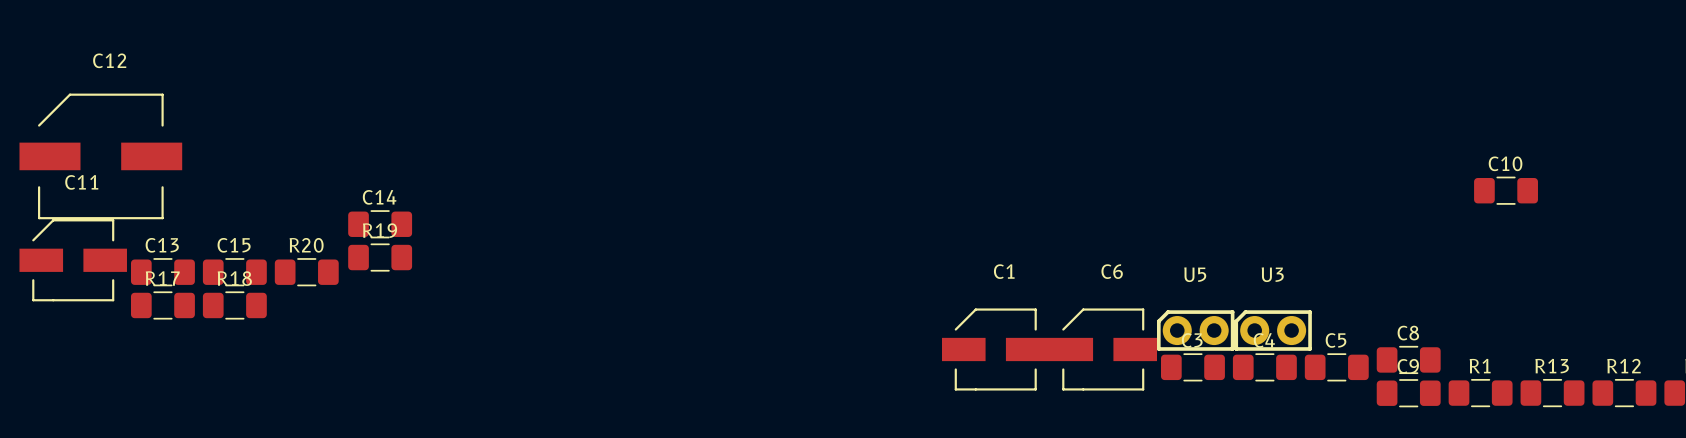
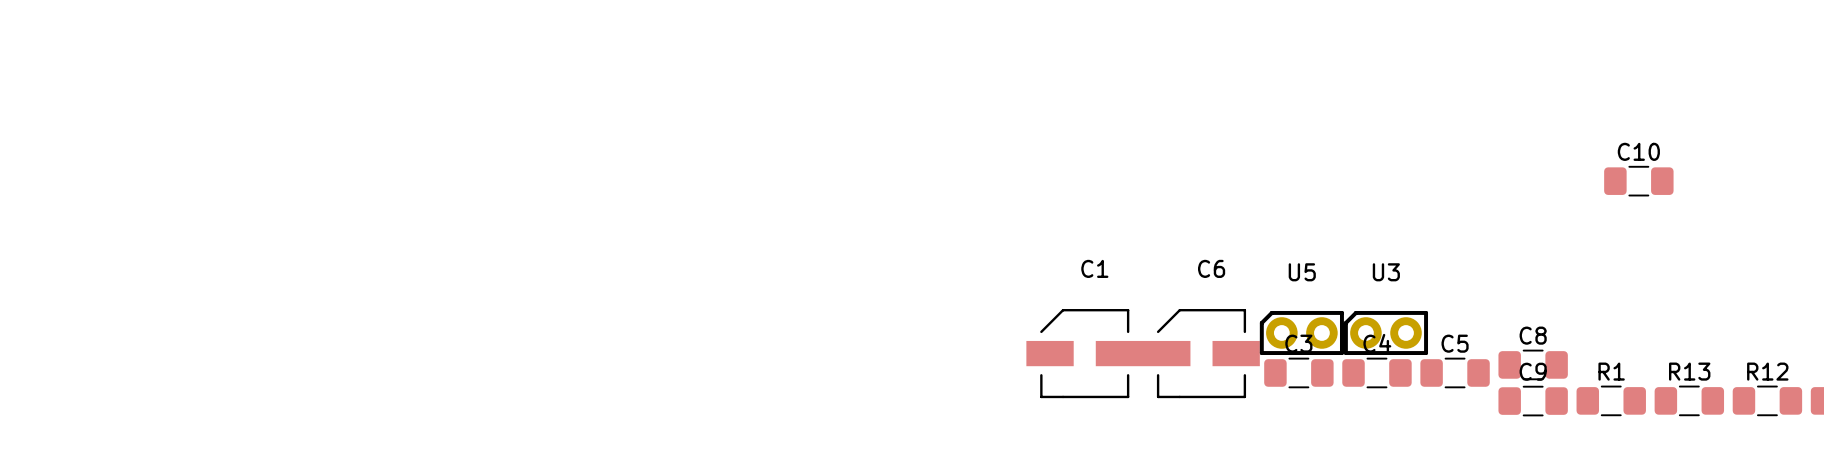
C12: (100, 156) -> none
C14: (380, 224) -> none
R19: (380, 257) -> none
C11: (73, 260) -> none
C13: (162, 272) -> none
C15: (234, 272) -> none
R20: (306, 272) -> none
R17: (162, 305) -> none
R18: (234, 305) -> none

